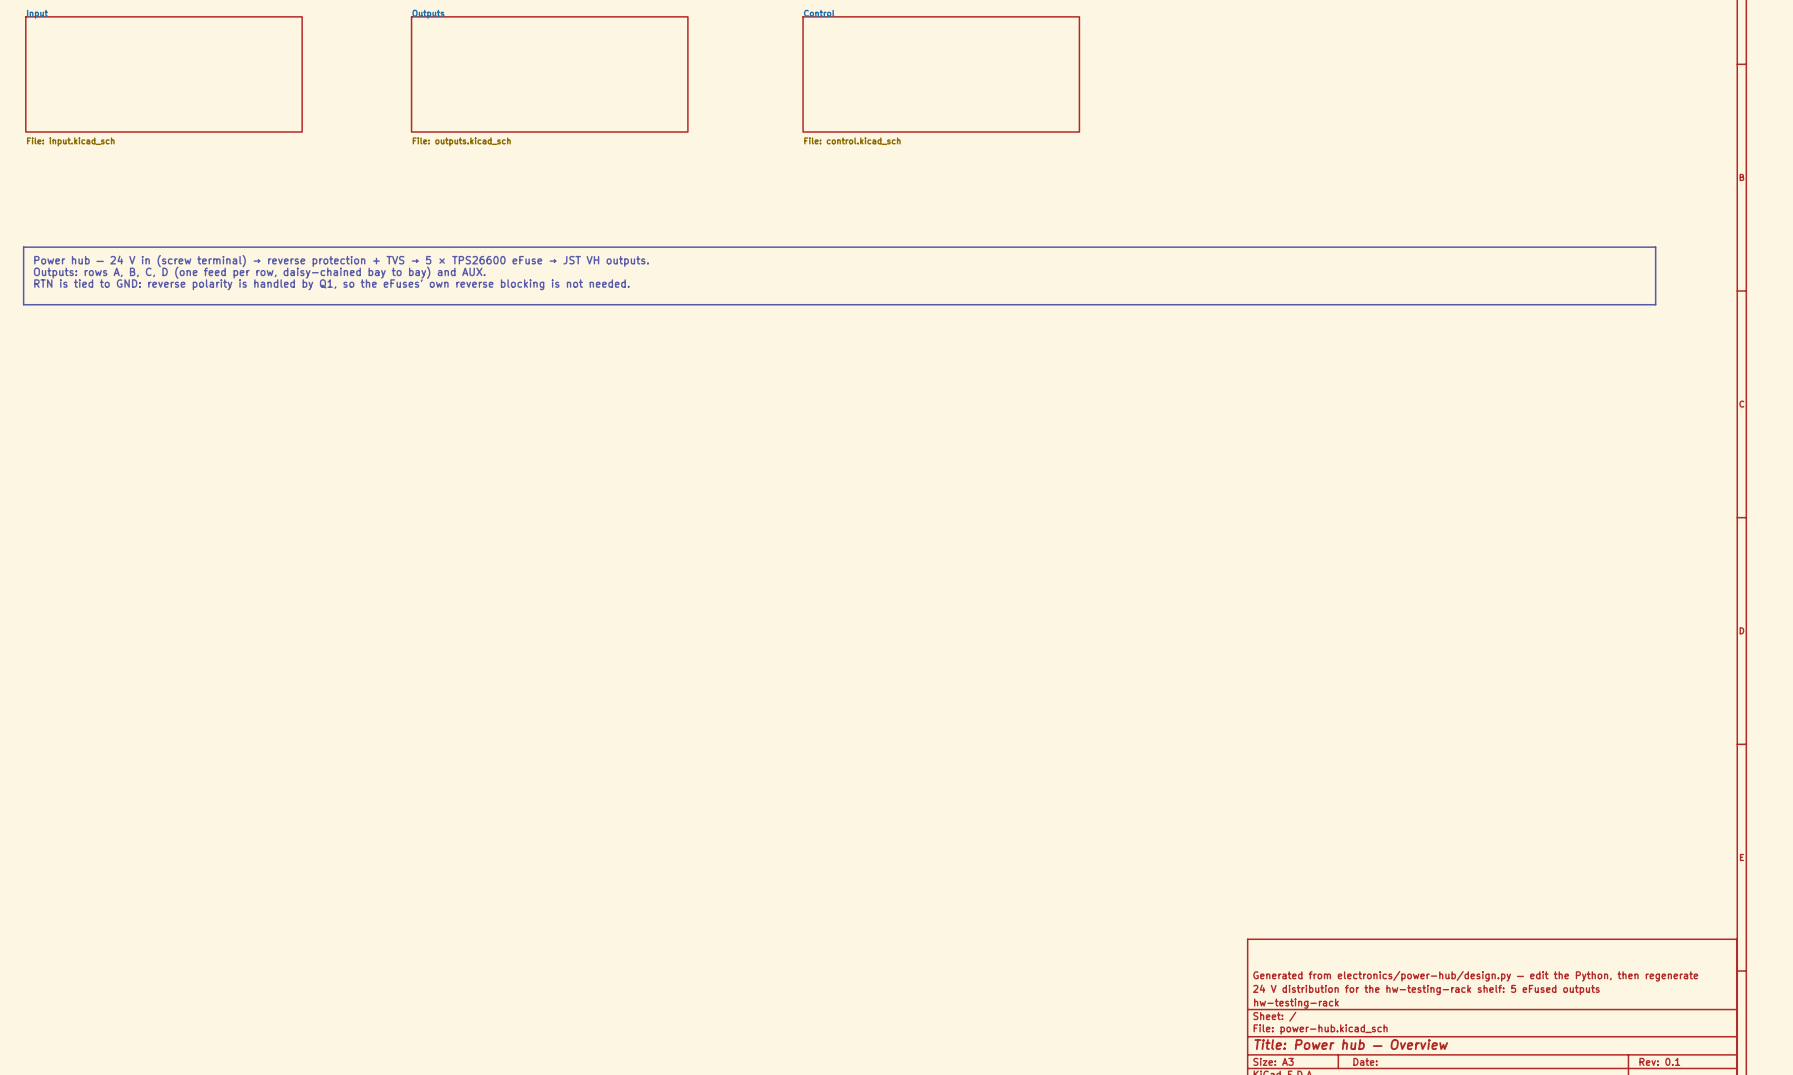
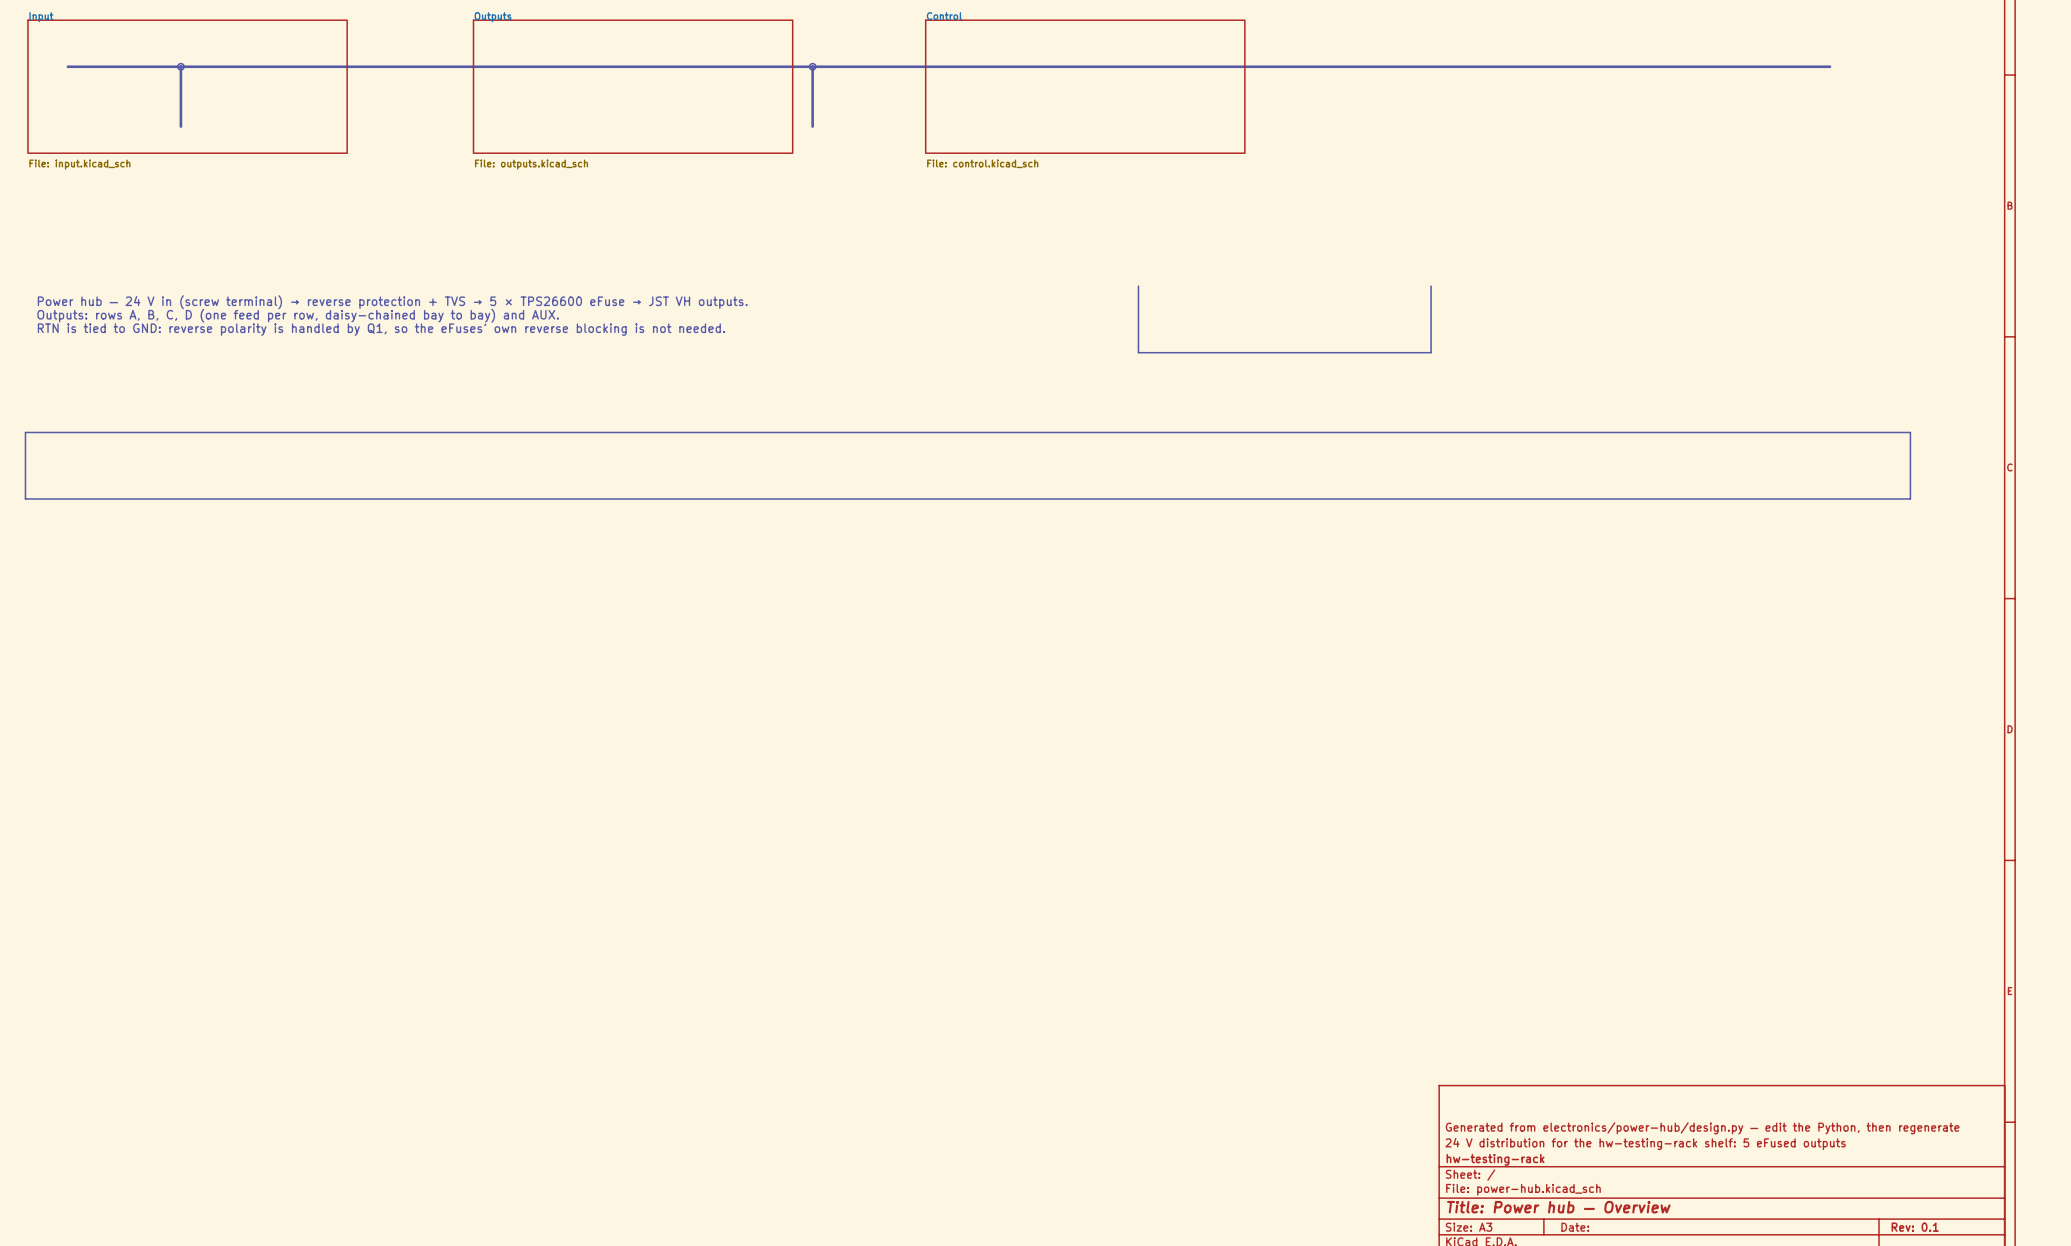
drawing: none -> [176, 62, 185, 71]
drawing: none -> [808, 62, 817, 71]
line: none -> (67, 66) (1830, 66)
line: none -> (180, 66) (180, 126)
line: none -> (812, 66) (812, 126)
line: none -> (1431, 286) (1431, 352)
line: (987, 304) (23, 304) (23, 247) (1655, 247) (1655, 304) (1240, 304) -> (1138, 352) (1138, 286)
line: none -> (25, 432) (1910, 432) (1910, 498) (25, 498) (25, 432)

